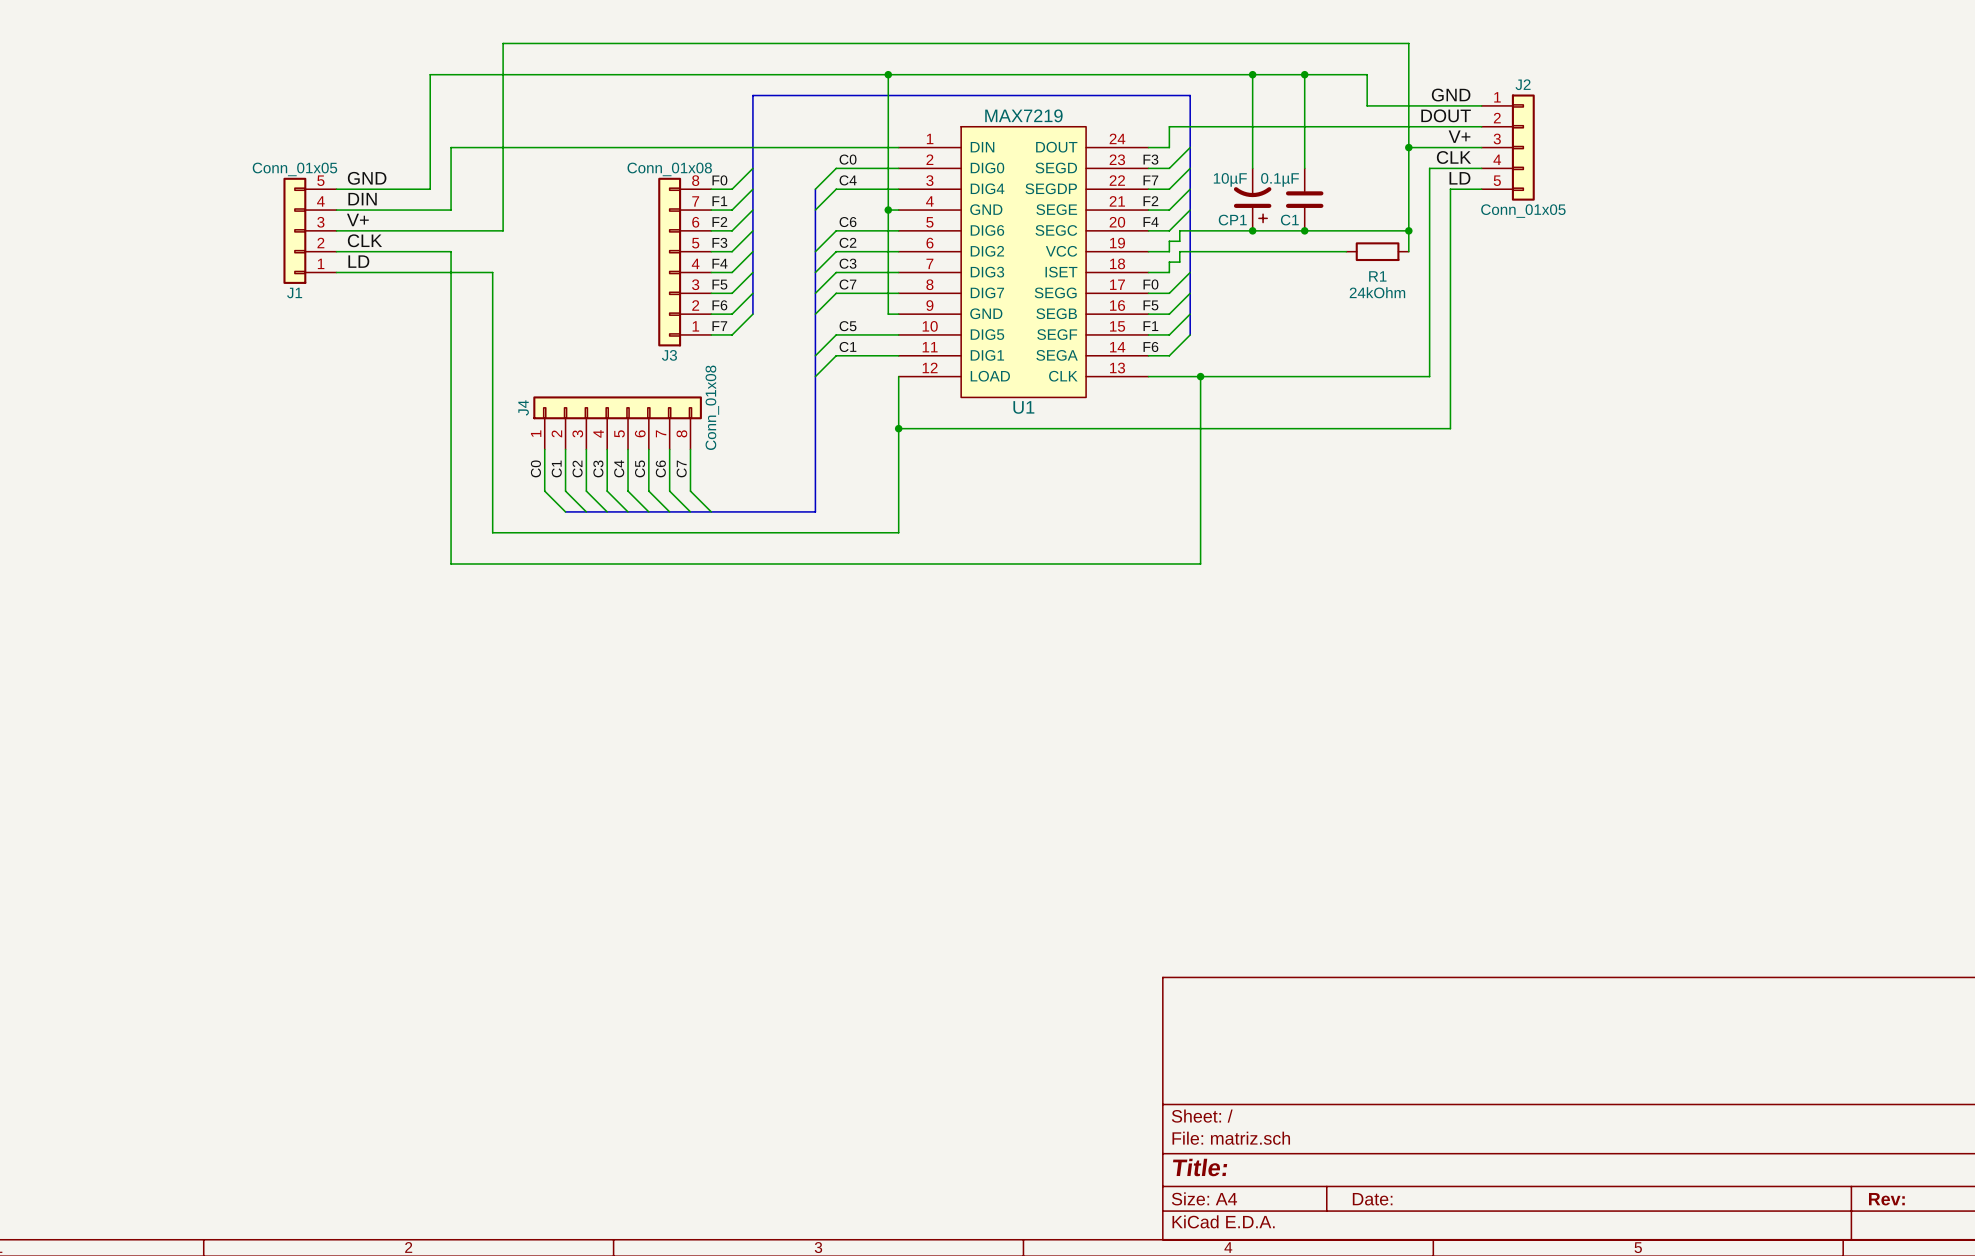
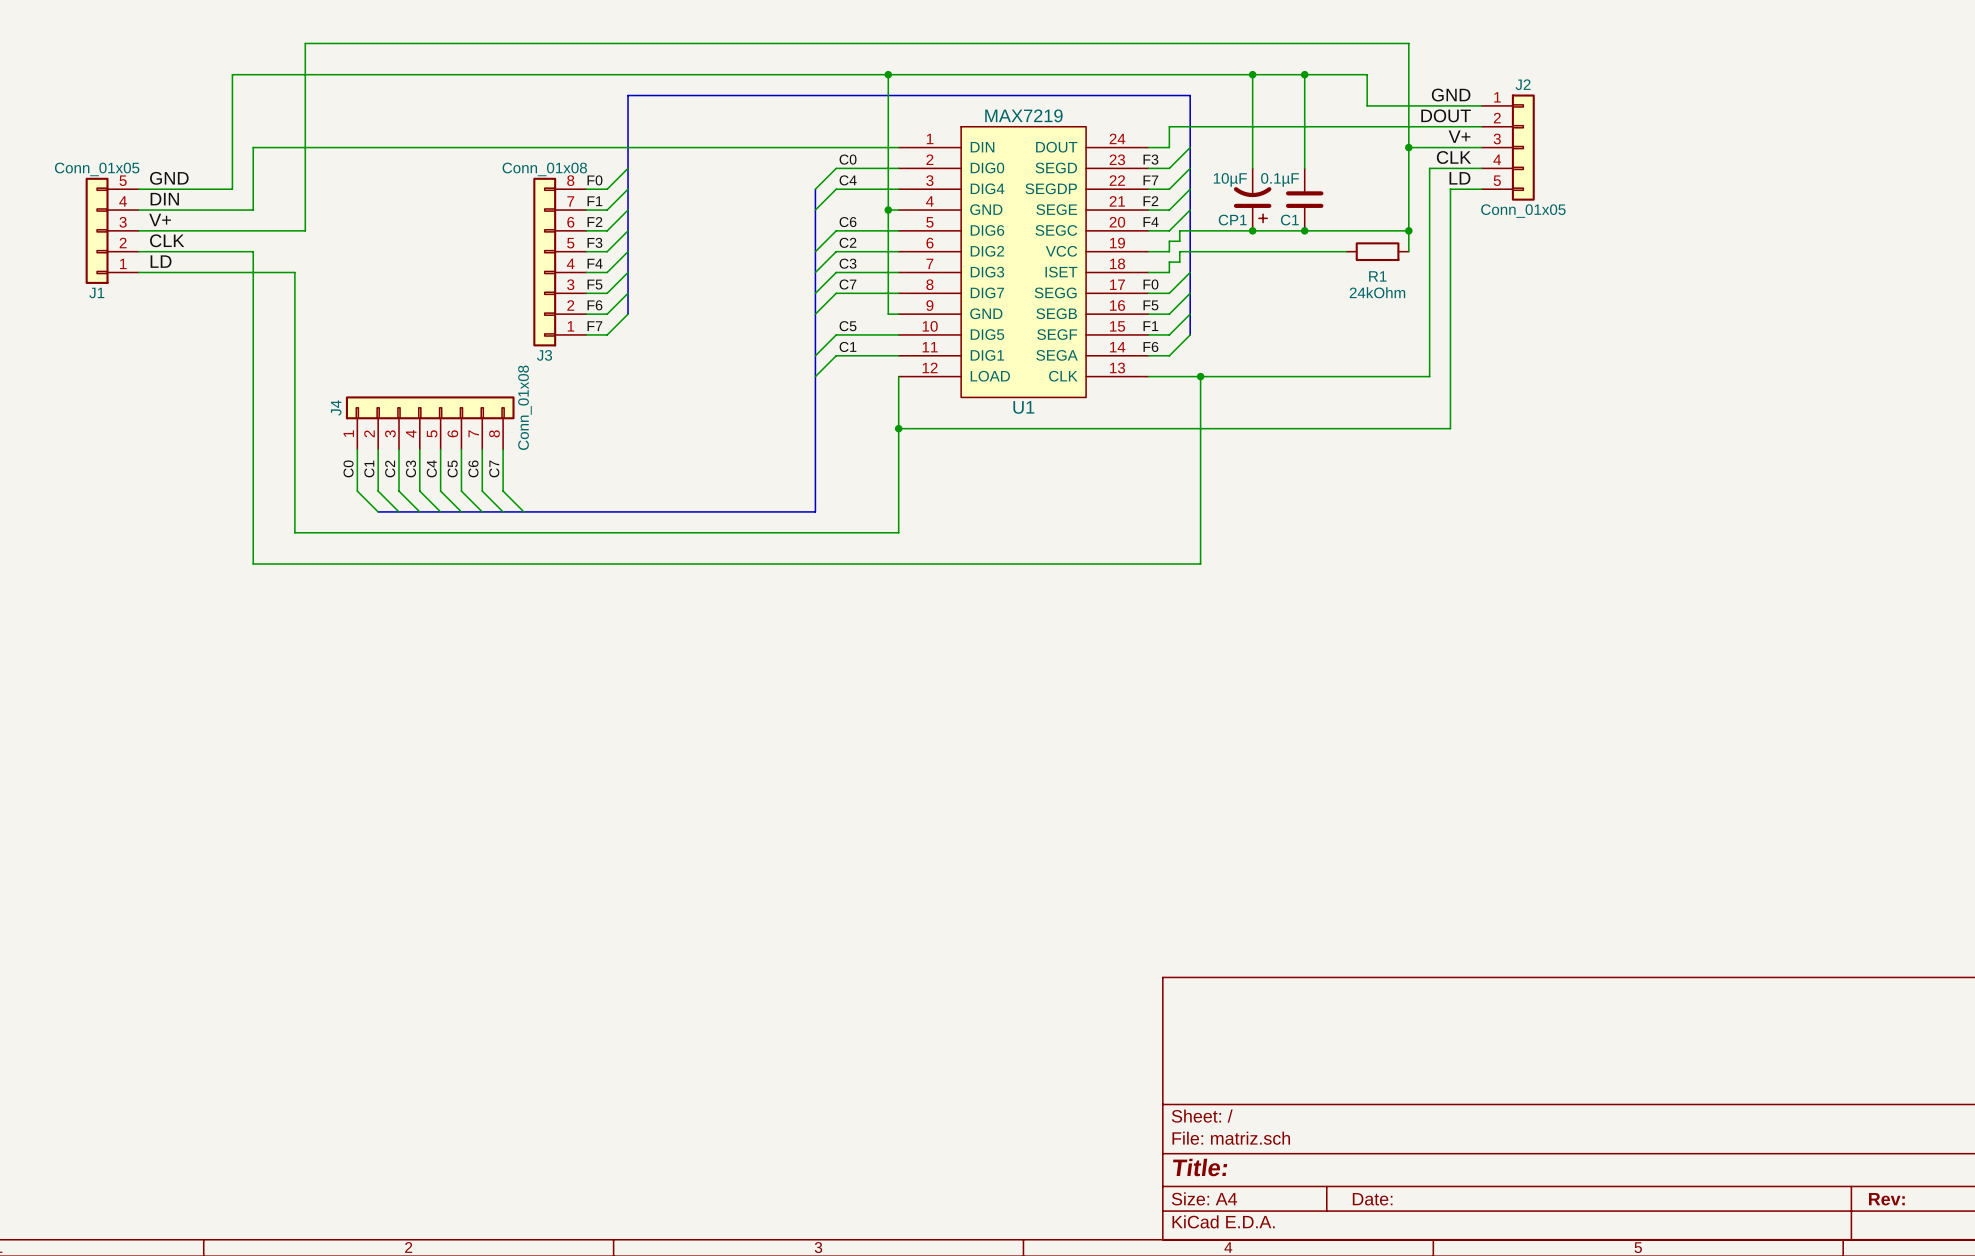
wire: (503, 43) (503, 230) (336, 230) -> (503, 43) (305, 43) (305, 230) (138, 230)
wire: (430, 74) (430, 189) (336, 189) -> (430, 74) (232, 74) (232, 189) (138, 189)
bus: (752, 95) (752, 314) -> (752, 95) (628, 95) (628, 314)
wire: (451, 147) (451, 210) (336, 210) -> (451, 147) (253, 147) (253, 210) (138, 210)
wire: (752, 168) (732, 189) (711, 189) -> (628, 168) (607, 189) (586, 189)
label position: GND (367, 178) -> GND (169, 178)
label position: F0 (719, 180) -> F0 (594, 180)
wire: (752, 189) (732, 210) (711, 210) -> (628, 189) (607, 210) (586, 210)
label position: DIN (362, 199) -> DIN (164, 199)
label position: F1 (719, 201) -> F1 (594, 201)
wire: (752, 210) (732, 230) (711, 230) -> (628, 210) (607, 230) (586, 230)
label position: V+ (357, 219) -> V+ (160, 219)
label position: F2 (719, 221) -> F2 (594, 221)
J1 position: (309, 230) -> (112, 230)
wire: (752, 230) (732, 251) (711, 251) -> (628, 230) (607, 251) (586, 251)
label position: CLK (364, 240) -> CLK (167, 240)
label position: F3 (719, 242) -> F3 (594, 242)
wire: (336, 251) (451, 251) (451, 563) -> (138, 251) (253, 251) (253, 563) (451, 563)
wire: (752, 251) (732, 272) (711, 272) -> (628, 251) (607, 272) (586, 272)
label position: LD (358, 261) -> LD (161, 261)
J3 position: (684, 262) -> (559, 262)
label position: F4 (719, 263) -> F4 (595, 263)
wire: (336, 272) (492, 272) (492, 532) -> (138, 272) (294, 272) (294, 532) (492, 532)
wire: (752, 272) (732, 293) (711, 293) -> (628, 272) (607, 293) (586, 293)
label position: F5 (719, 284) -> F5 (594, 284)
wire: (752, 293) (732, 314) (711, 314) -> (628, 293) (607, 314) (586, 314)
label position: F6 (719, 305) -> F6 (594, 305)
wire: (752, 314) (732, 334) (711, 334) -> (628, 314) (607, 334) (586, 334)
label position: F7 (719, 326) -> F7 (594, 326)
J4 position: (617, 422) -> (430, 422)
wire: none -> (357, 449) (357, 491) (378, 511)
wire: none -> (378, 449) (378, 491) (398, 511)
wire: none -> (398, 449) (398, 491) (419, 511)
wire: (544, 449) (544, 491) (565, 511) -> (419, 449) (419, 491) (440, 511)
wire: (565, 449) (565, 491) (586, 511) -> (440, 449) (440, 491) (461, 511)
wire: (586, 449) (586, 491) (607, 511) -> (461, 449) (461, 491) (482, 511)
wire: (607, 449) (607, 491) (628, 511) -> (482, 449) (482, 491) (503, 511)
wire: (628, 449) (628, 491) (648, 511) -> (503, 449) (503, 491) (523, 511)
wire: (648, 449) (648, 491) (669, 511) -> none
wire: (669, 449) (669, 491) (690, 511) -> none
wire: (690, 449) (690, 491) (711, 511) -> none
label position: C0 (535, 468) -> C0 (348, 468)
label position: C1 (556, 468) -> C1 (369, 468)
label position: C2 (577, 468) -> C2 (390, 468)
label position: C3 (598, 468) -> C3 (411, 468)
label position: C4 (619, 468) -> C4 (431, 468)
label position: C5 (640, 468) -> C5 (452, 468)
label position: C6 (660, 468) -> C6 (473, 468)
label position: C7 (681, 468) -> C7 (494, 468)
bus: none -> (378, 511) (565, 511)

